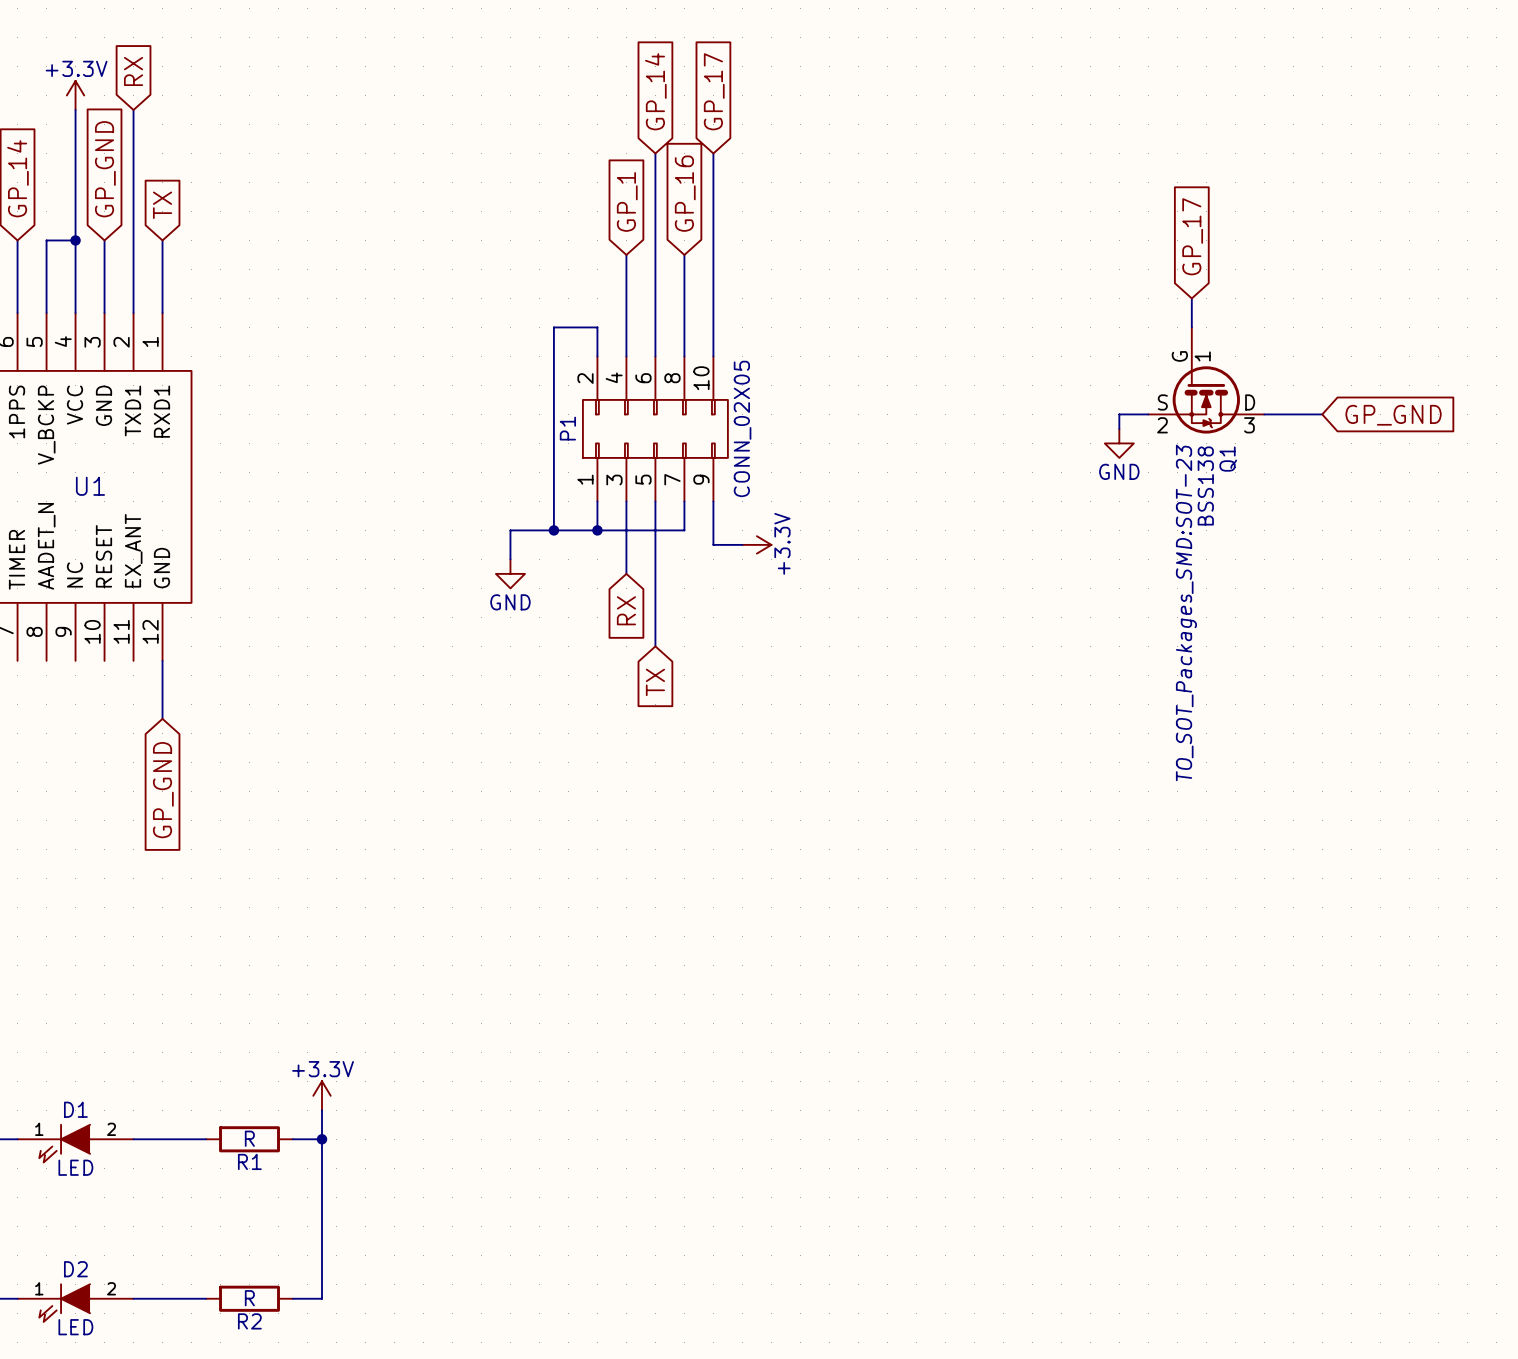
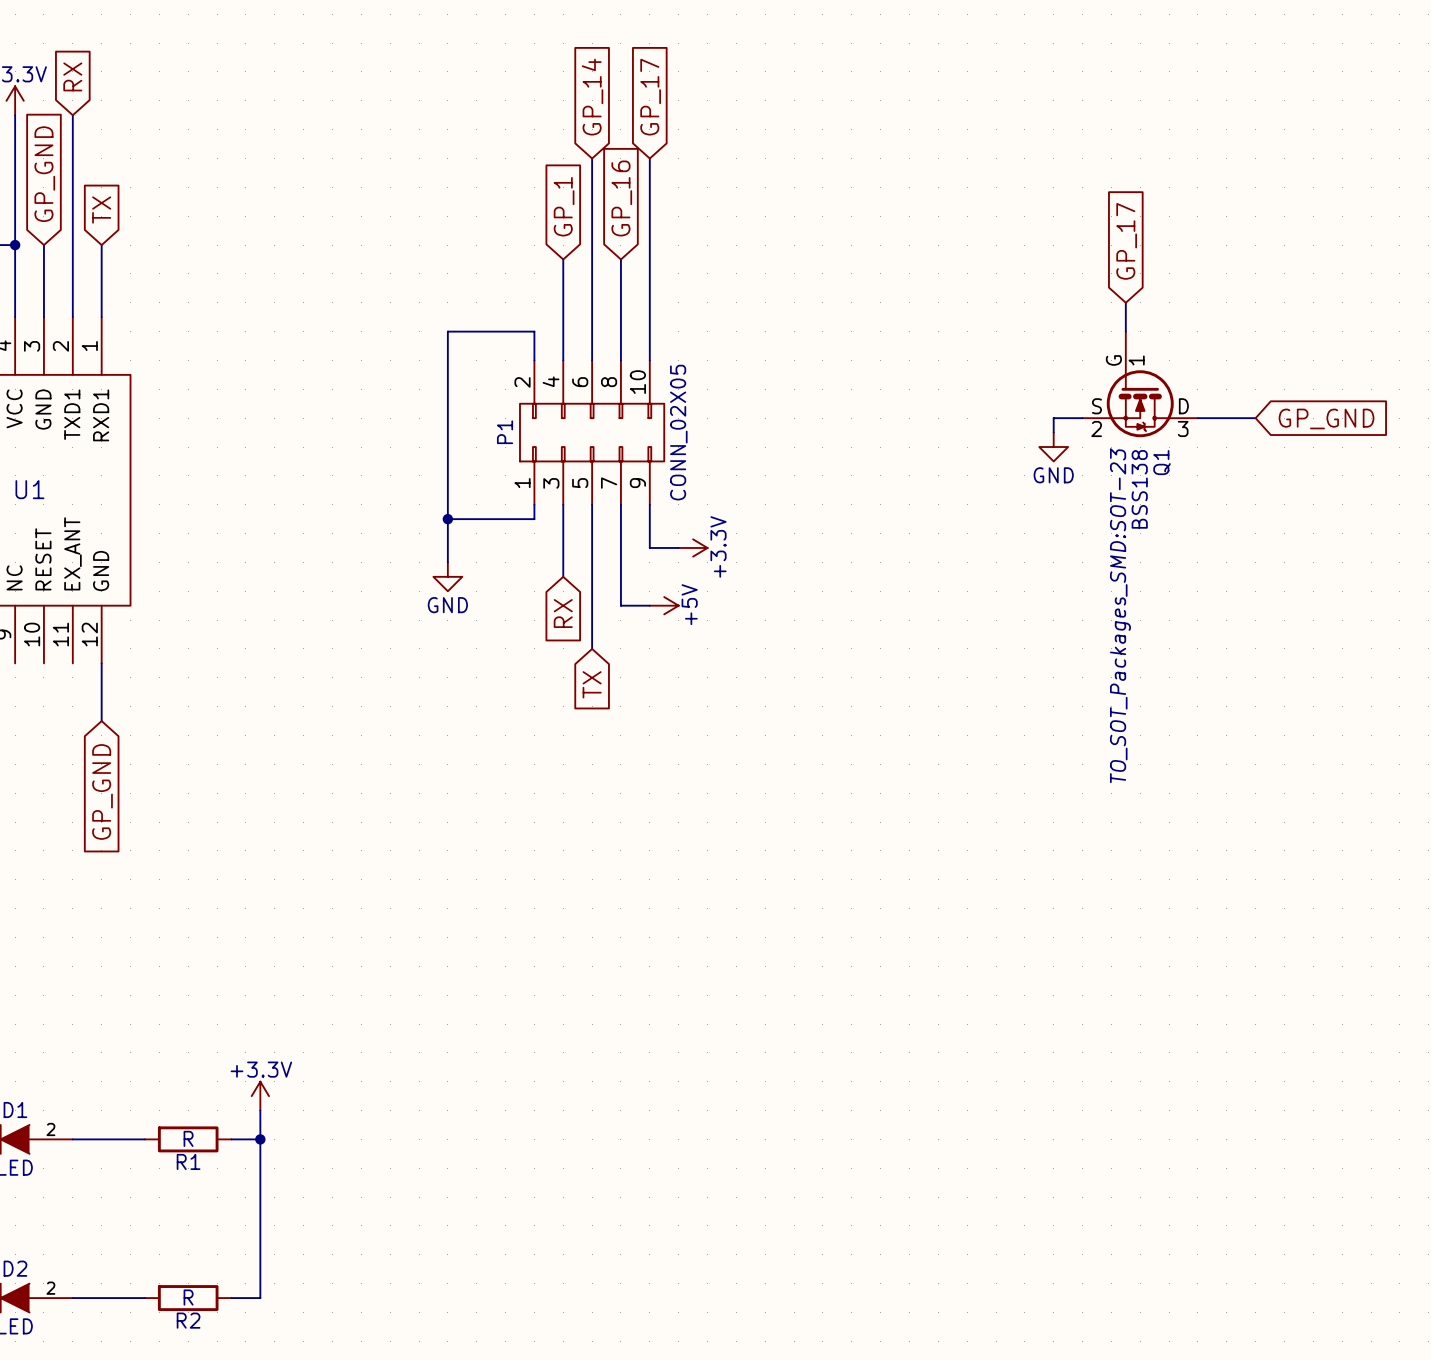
wire: (553, 327) (553, 530) -> (491, 331) (447, 331) (447, 533)
junction: none -> (447, 519)
wire: (597, 515) (597, 530) -> (534, 519) (447, 519)
wire: (510, 530) (684, 530) -> (649, 605) (620, 605) (620, 533)
junction: (553, 530) -> none
junction: (597, 530) -> none
power symbol: none -> +5V (664, 605)

